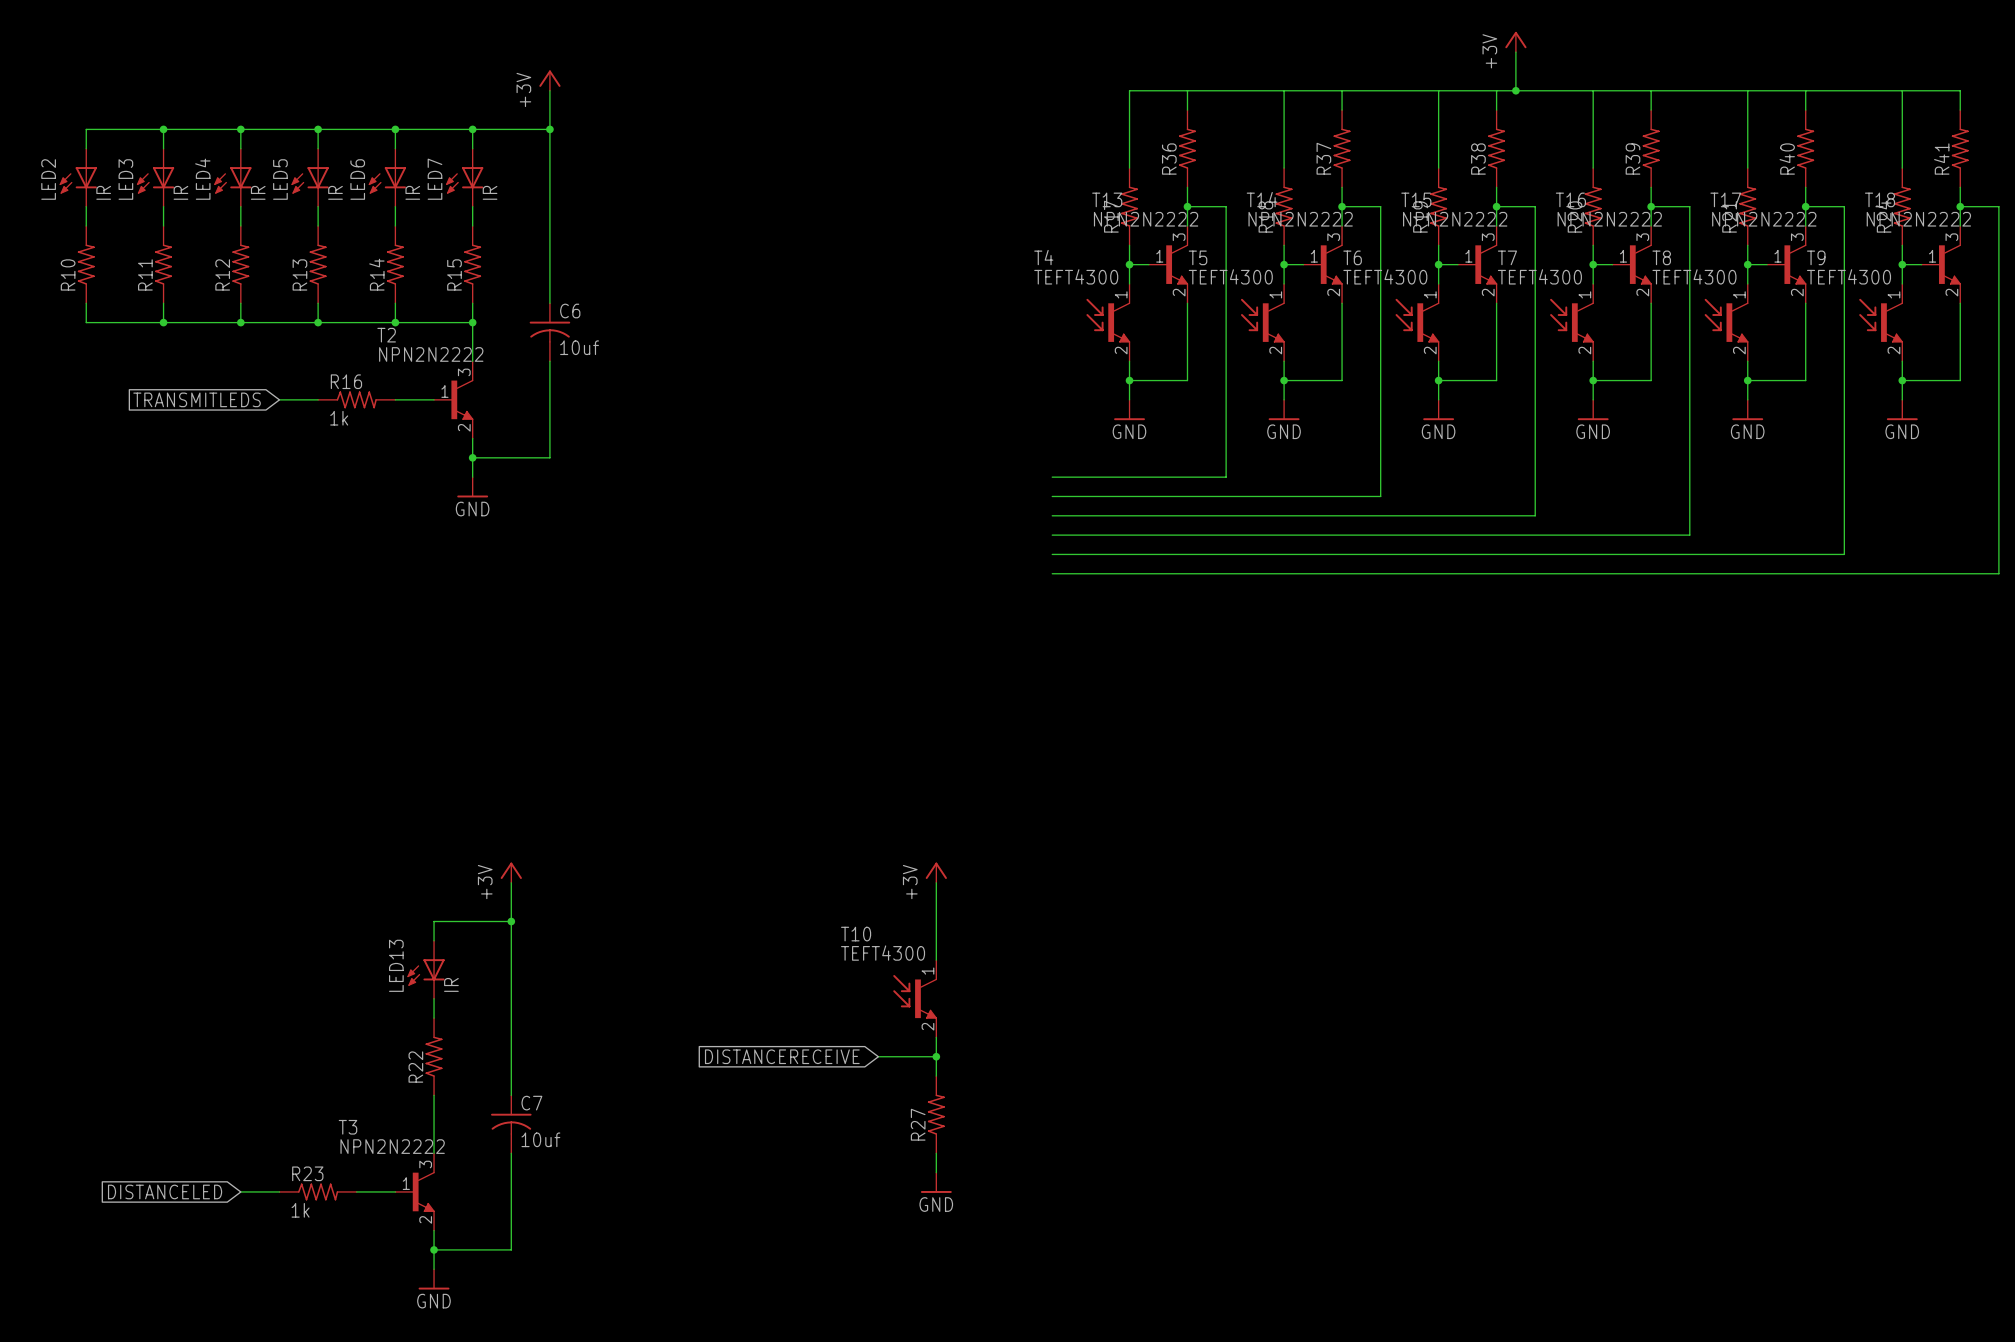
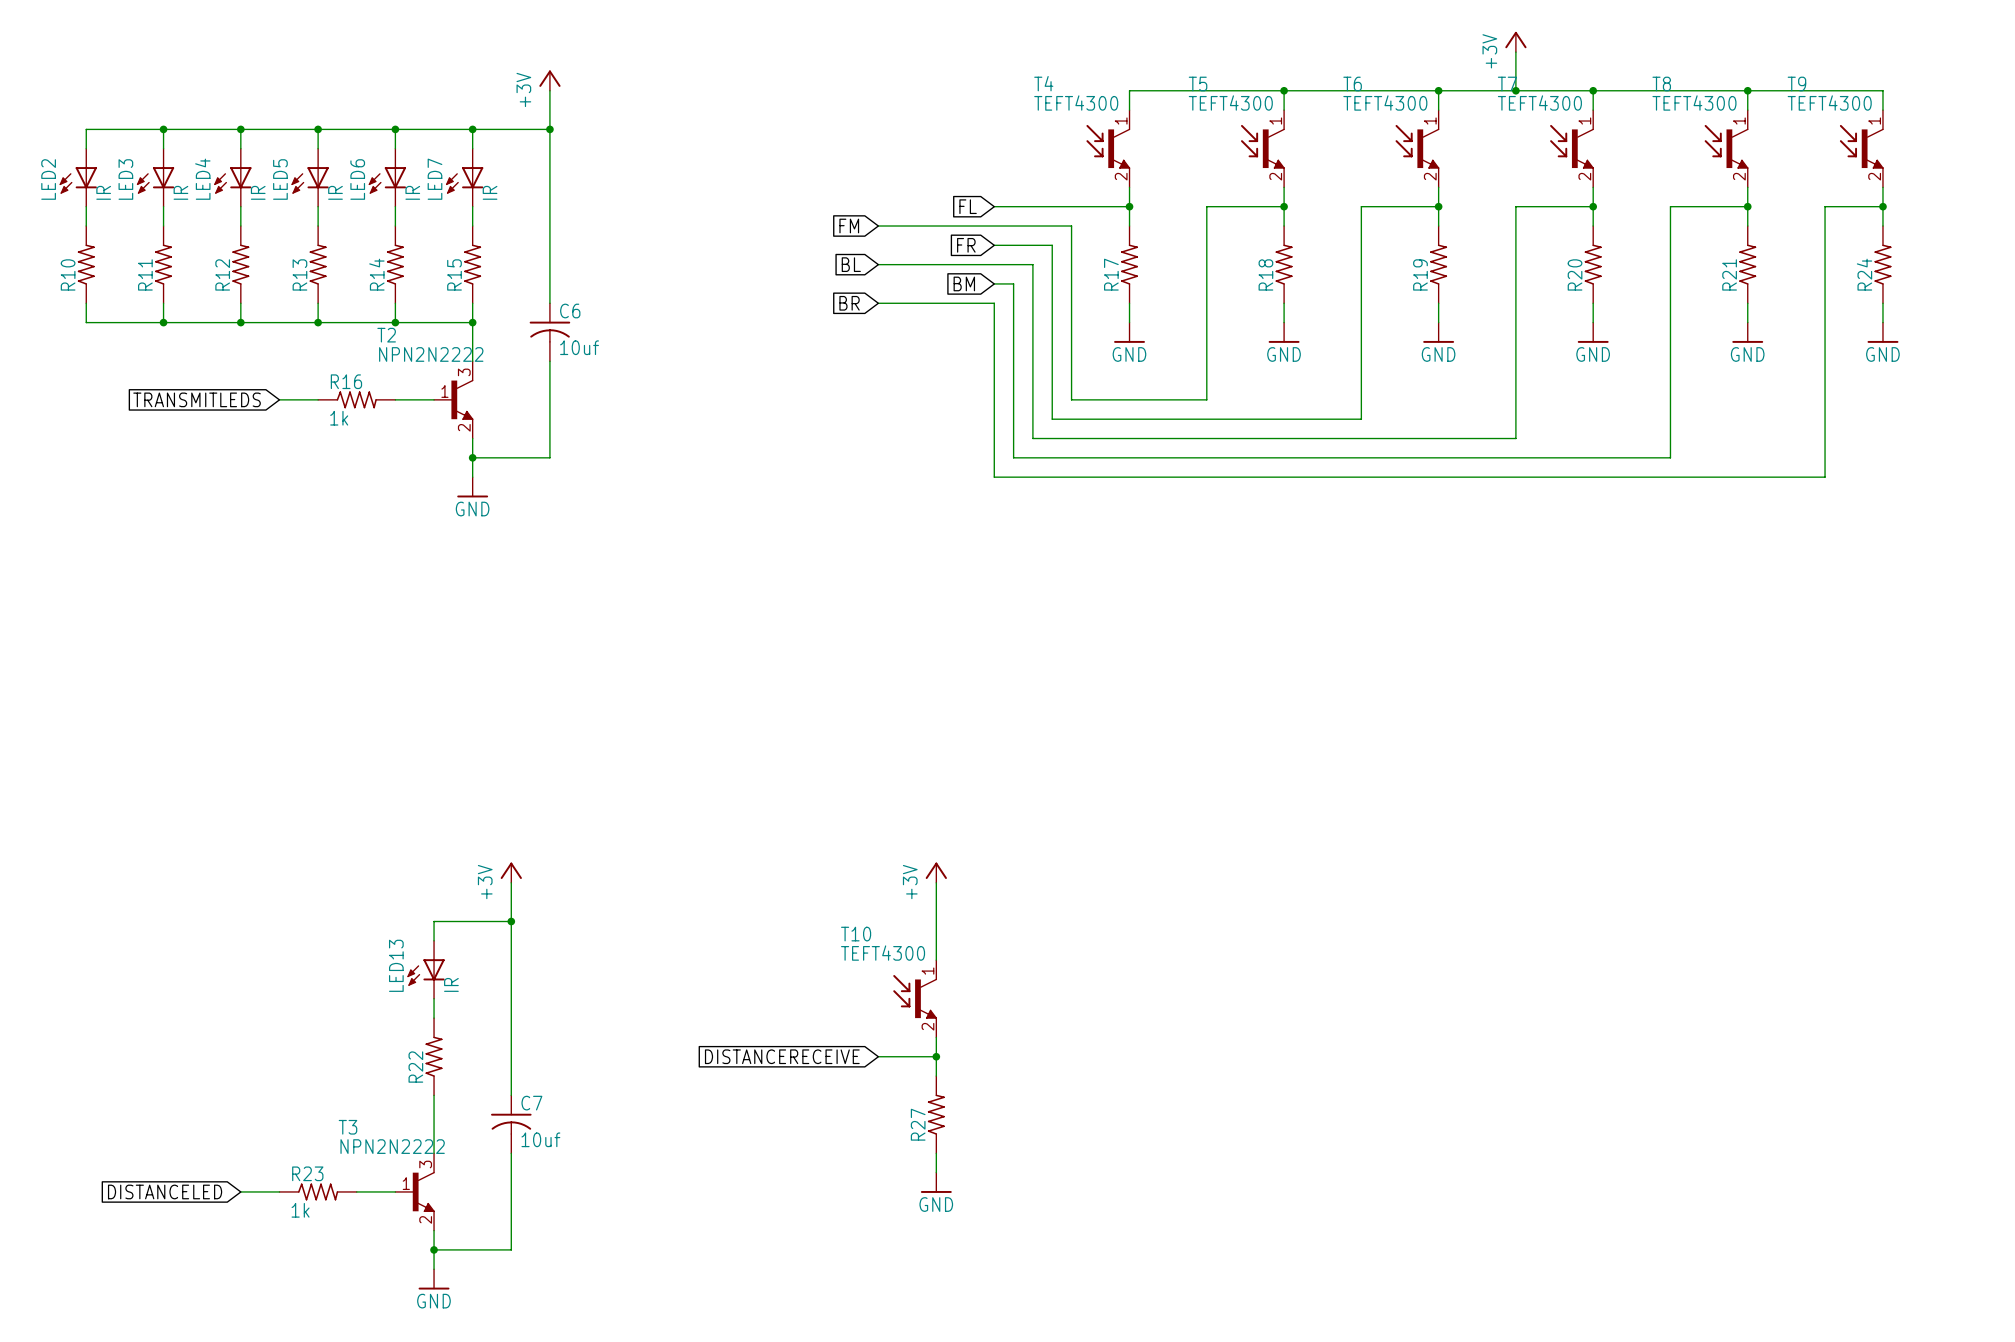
wire: (1187, 90) (1187, 110) -> none
junction: none -> (1284, 90)
wire: (1342, 90) (1342, 110) -> none
junction: none -> (1438, 90)
wire: (1496, 90) (1496, 110) -> none
junction: none -> (1593, 90)
wire: (1651, 90) (1651, 110) -> none
junction: none -> (1747, 90)
wire: (1805, 90) (1805, 110) -> none
wire: (1882, 90) (1960, 90) (1960, 110) -> (1882, 90) (1882, 110)
wire: (1902, 90) (1902, 168) -> none
wire: (1129, 110) (1129, 168) -> none
wire: (1284, 110) (1284, 168) -> none
wire: (1438, 110) (1438, 168) -> none
wire: (1593, 110) (1593, 168) -> none
wire: (1747, 110) (1747, 168) -> none
R36: (1187, 148) -> none
R37: (1342, 148) -> none
R38: (1496, 148) -> none
R39: (1651, 148) -> none
R40: (1805, 148) -> none
R41: (1960, 148) -> none
wire: (1187, 187) (1187, 226) -> (1129, 187) (1129, 226)
wire: (1342, 187) (1342, 226) -> (1284, 187) (1284, 226)
wire: (1496, 187) (1496, 226) -> (1438, 187) (1438, 226)
wire: (1651, 187) (1651, 226) -> (1593, 187) (1593, 226)
wire: (1805, 187) (1805, 226) -> (1747, 187) (1747, 226)
wire: (1960, 187) (1960, 226) -> none
global label: none -> FL (968, 206)
wire: none -> (994, 206) (1129, 206)
R17 position: (1129, 206) -> (1129, 264)
junction: none -> (1129, 206)
wire: (1187, 206) (1206, 206) -> (878, 226) (1071, 226) (1071, 399) (1206, 399) (1206, 206)
junction: (1187, 206) -> none
wire: (1226, 206) (1226, 477) -> (1226, 206) (1284, 206)
R18 position: (1284, 206) -> (1284, 264)
junction: none -> (1284, 206)
wire: (1342, 206) (1361, 206) -> (994, 245) (1052, 245) (1052, 419) (1361, 419) (1361, 206)
junction: (1342, 206) -> none
wire: (1380, 206) (1380, 496) (1052, 496) -> (1380, 206) (1438, 206)
R19 position: (1438, 206) -> (1438, 264)
junction: none -> (1438, 206)
wire: (1496, 206) (1515, 206) -> (878, 264) (1032, 264) (1032, 438) (1515, 438) (1515, 206)
junction: (1496, 206) -> none
wire: (1535, 206) (1535, 515) (1052, 515) -> (1535, 206) (1593, 206)
R20 position: (1593, 206) -> (1593, 264)
junction: none -> (1593, 206)
wire: (1651, 206) (1670, 206) -> (994, 283) (1013, 283) (1013, 457) (1670, 457) (1670, 206)
junction: (1651, 206) -> none
wire: (1689, 206) (1689, 535) (1052, 535) -> (1689, 206) (1747, 206)
R21 position: (1747, 206) -> (1747, 264)
junction: none -> (1747, 206)
wire: (1805, 206) (1825, 206) -> (1226, 477) (1825, 477) (1825, 206)
junction: (1805, 206) -> none
wire: (1844, 206) (1844, 554) (1052, 554) -> (1844, 206) (1882, 206)
junction: none -> (1882, 206)
R24 position: (1902, 206) -> (1882, 264)
wire: (1960, 206) (1998, 206) (1998, 573) (1052, 573) -> none
junction: (1960, 206) -> none
global label: none -> FM (849, 226)
global label: none -> FR (966, 245)
wire: (1129, 245) (1129, 283) -> none
wire: (1284, 245) (1284, 283) -> none
wire: (1438, 245) (1438, 283) -> none
wire: (1593, 245) (1593, 283) -> none
wire: (1747, 245) (1747, 283) -> none
wire: (1902, 245) (1902, 283) -> (1882, 187) (1882, 226)
global label: none -> BL (851, 264)
wire: (1129, 264) (1148, 264) -> none
junction: (1129, 264) -> none
T13: NPN2N2222 (1168, 264) -> none
wire: (1284, 264) (1303, 264) -> none
junction: (1284, 264) -> none
T14: NPN2N2222 (1323, 264) -> none
wire: (1438, 264) (1457, 264) -> none
junction: (1438, 264) -> none
T15: NPN2N2222 (1477, 264) -> none
wire: (1593, 264) (1612, 264) -> none
junction: (1593, 264) -> none
T16: NPN2N2222 (1632, 264) -> none
wire: (1747, 264) (1767, 264) -> none
junction: (1747, 264) -> none
T17: NPN2N2222 (1786, 264) -> none
wire: (1902, 264) (1921, 264) -> none
junction: (1902, 264) -> none
T18: NPN2N2222 (1941, 264) -> none
global label: none -> BM (964, 283)
global label: none -> BR (849, 303)
wire: none -> (878, 303) (994, 303) (994, 477) (1052, 477)
wire: none -> (1129, 303) (1129, 322)
wire: (1187, 303) (1187, 380) (1129, 380) -> none
wire: none -> (1284, 303) (1284, 322)
wire: (1342, 303) (1342, 380) (1284, 380) -> none
wire: none -> (1438, 303) (1438, 322)
wire: (1496, 303) (1496, 380) (1438, 380) -> none
wire: none -> (1593, 303) (1593, 322)
wire: (1651, 303) (1651, 380) (1593, 380) -> none
wire: none -> (1747, 303) (1747, 322)
wire: (1805, 303) (1805, 380) (1747, 380) -> none
wire: (1960, 303) (1960, 380) (1902, 380) -> none
T4 position: (1108, 322) -> (1108, 148)
T5 position: (1262, 322) -> (1262, 148)
T6 position: (1417, 322) -> (1417, 148)
T7 position: (1571, 322) -> (1571, 148)
T8 position: (1726, 322) -> (1726, 148)
T9 position: (1881, 322) -> (1861, 148)
power symbol: none -> GND (1882, 332)
wire: (1129, 361) (1129, 399) -> none
wire: (1284, 361) (1284, 399) -> none
wire: (1438, 361) (1438, 399) -> none
wire: (1593, 361) (1593, 399) -> none
wire: (1747, 361) (1747, 399) -> none
wire: (1902, 361) (1902, 399) -> none
junction: (1129, 380) -> none
junction: (1284, 380) -> none
junction: (1438, 380) -> none
junction: (1593, 380) -> none
junction: (1747, 380) -> none
junction: (1902, 380) -> none
power symbol position: GND (1129, 410) -> GND (1129, 332)
power symbol position: GND (1284, 410) -> GND (1284, 332)
power symbol position: GND (1438, 410) -> GND (1438, 332)
power symbol position: GND (1593, 410) -> GND (1593, 332)
power symbol position: GND (1747, 410) -> GND (1747, 332)
power symbol: GND (1902, 410) -> none

